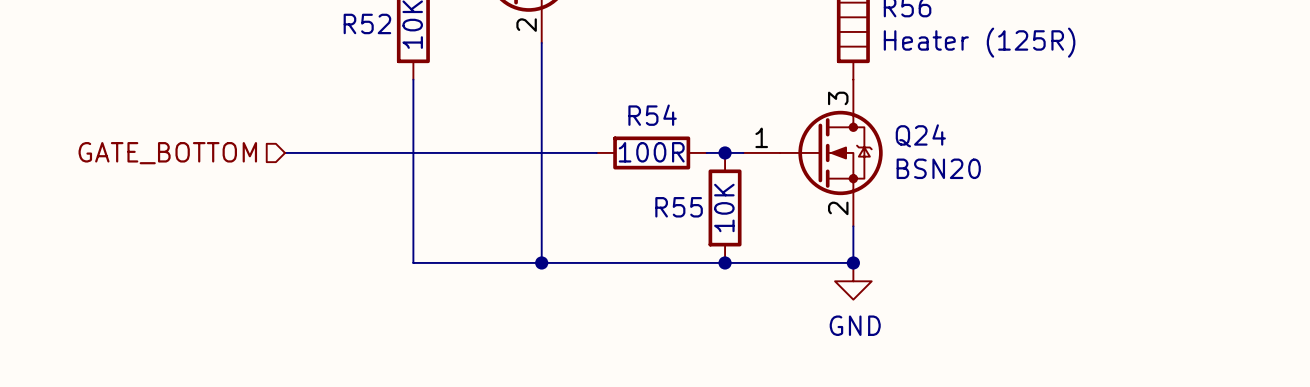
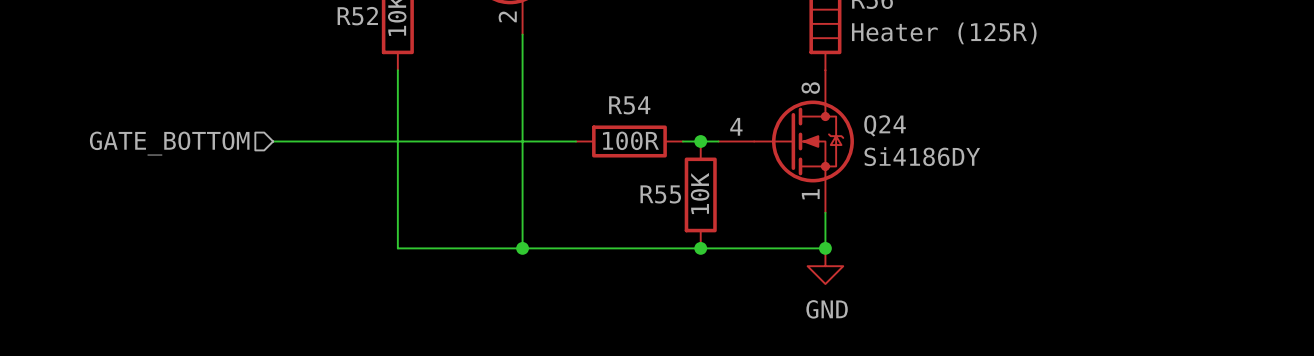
Q24 pin number: 3 (838, 98) -> 8 (810, 88)
Q24 pin number: 1 (761, 137) -> 4 (736, 126)
Q24 value: BSN20 (938, 168) -> Si4186DY (922, 156)
Q24 pin number: 2 (838, 208) -> 1 (810, 194)

